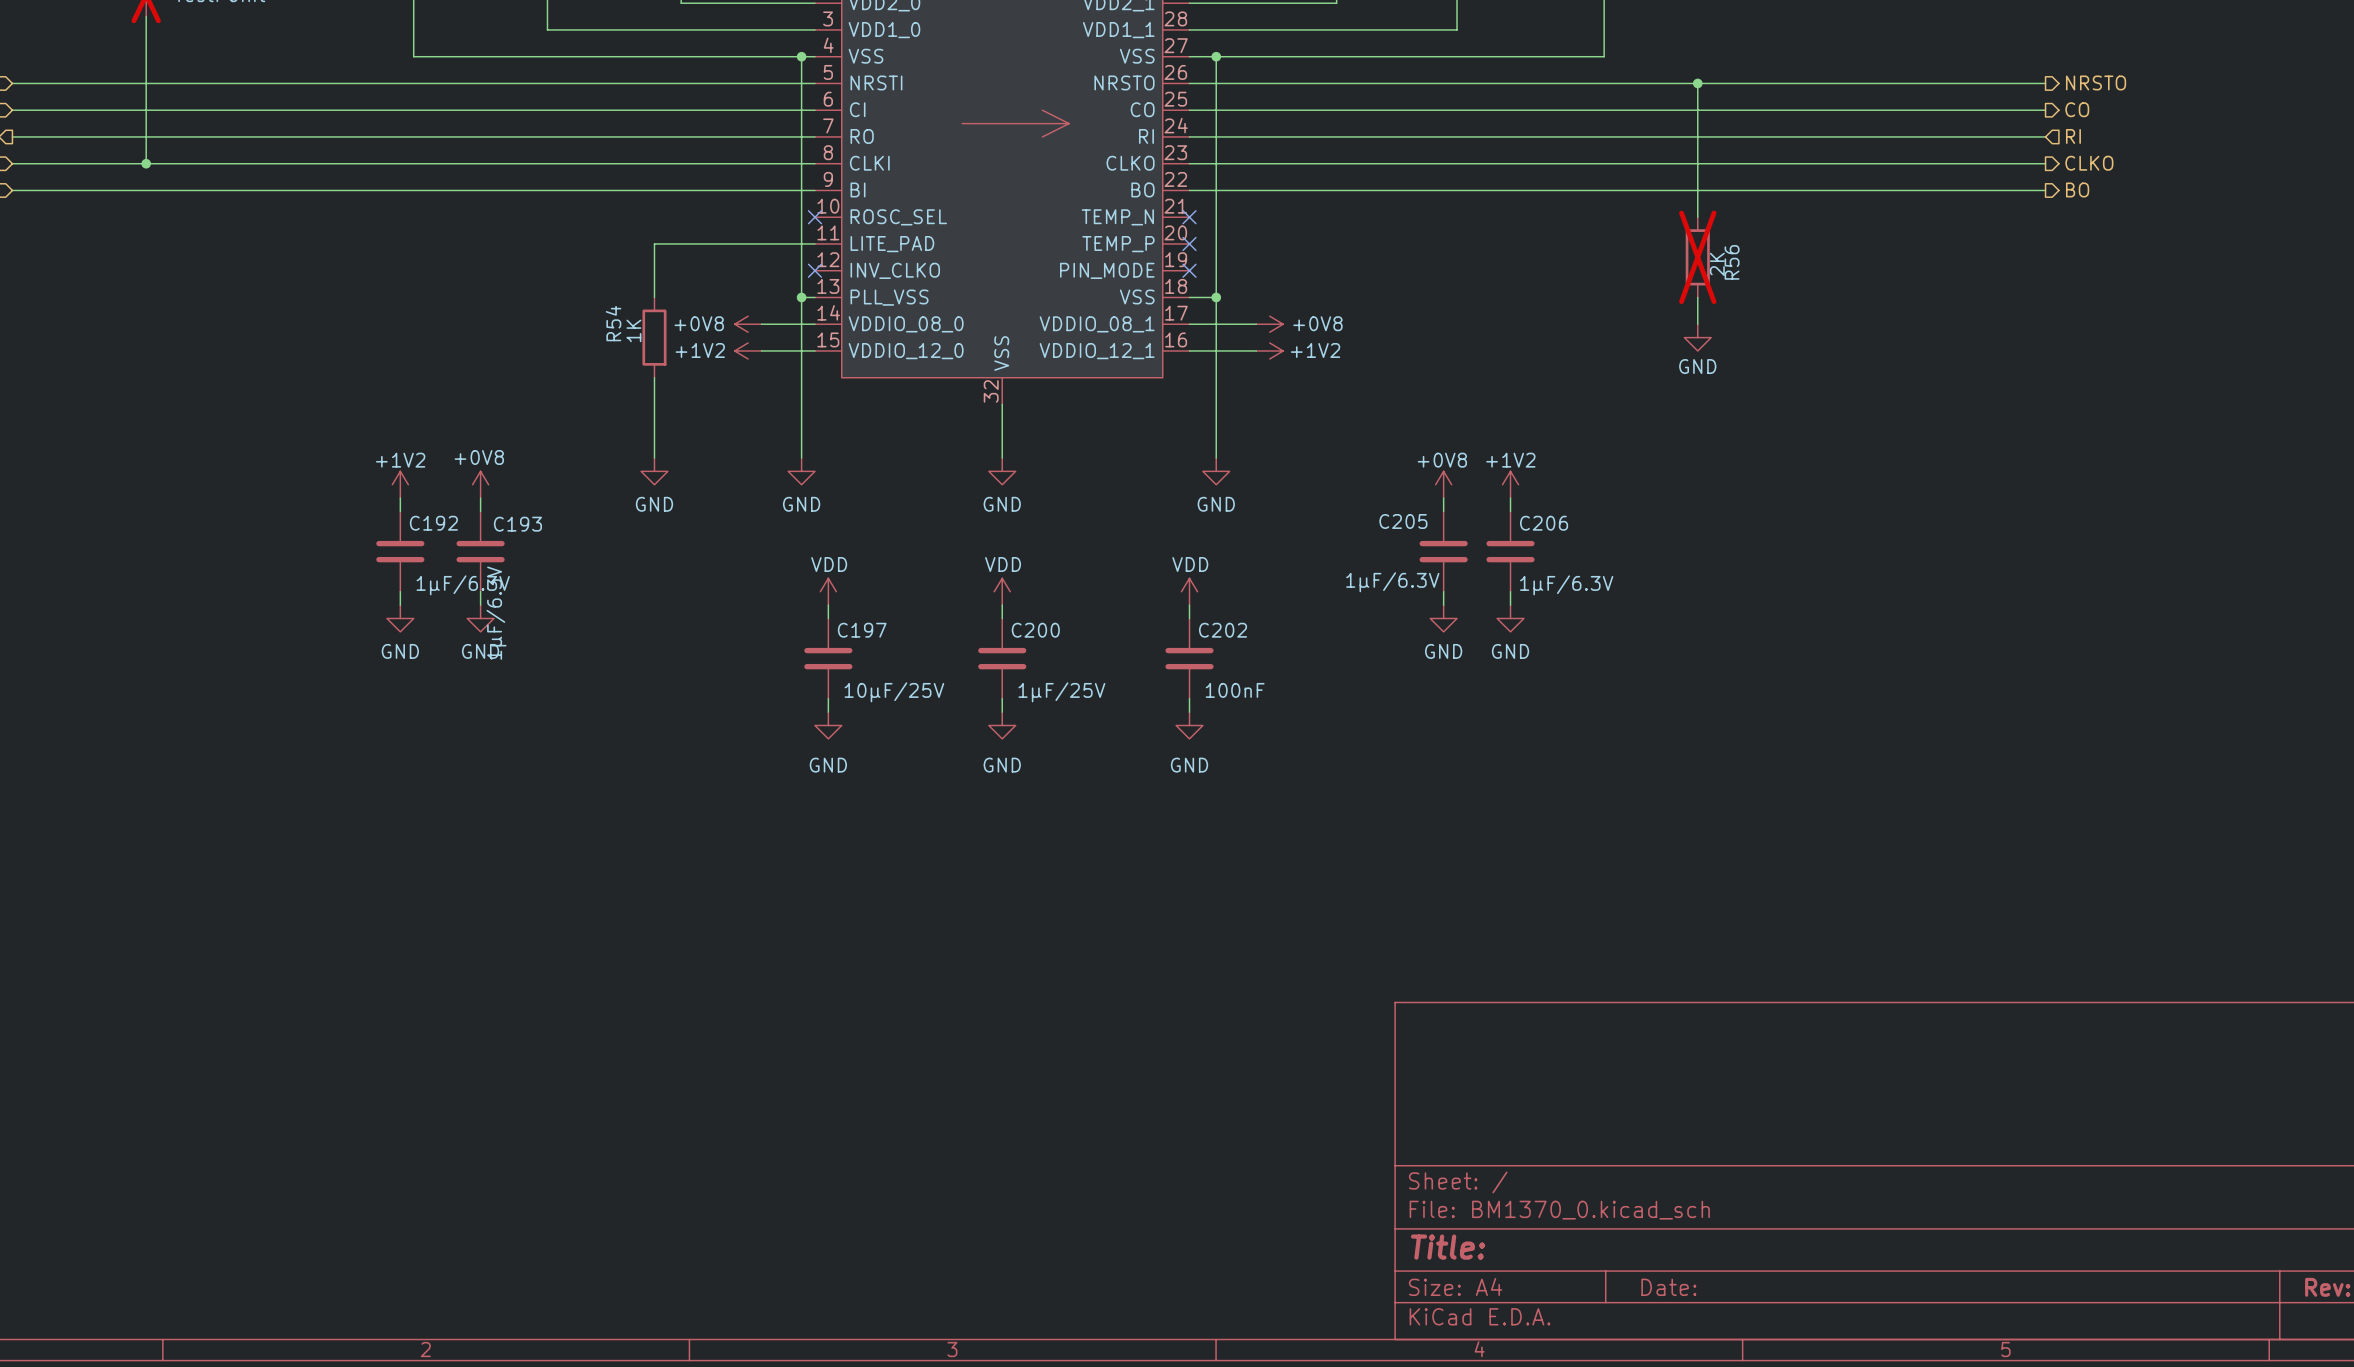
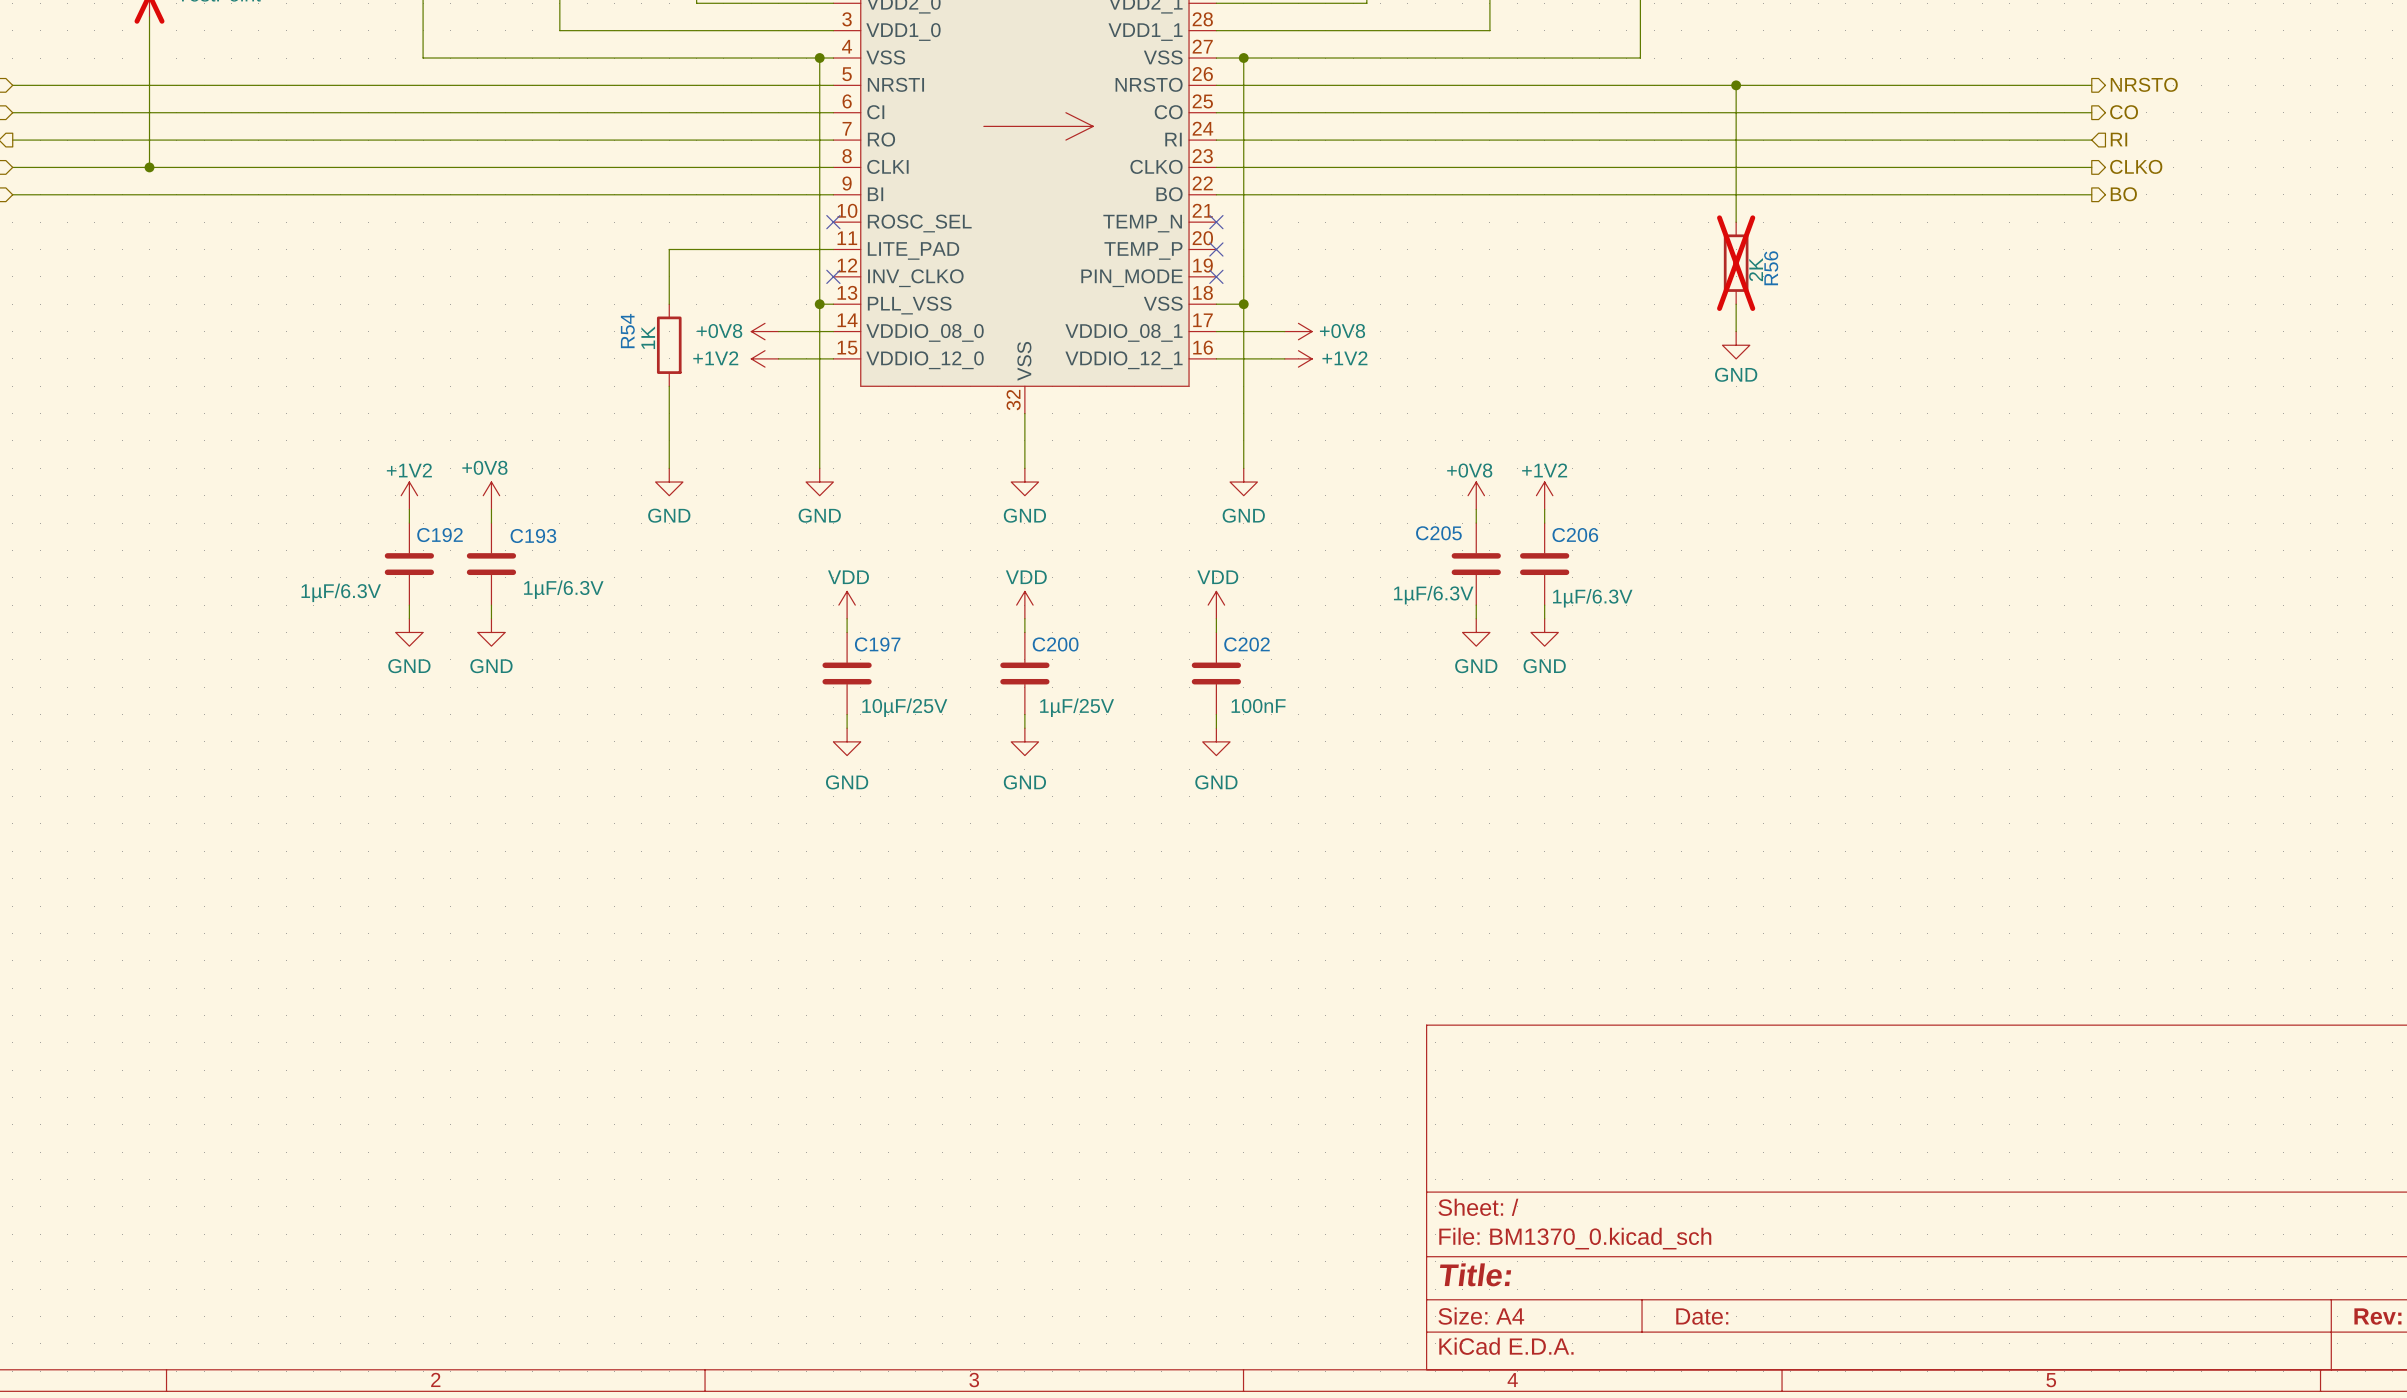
C192 value position: 1µF/6.3V (463, 585) -> 1µF/6.3V (341, 592)
C193 value rotation: 0° (496, 613) -> 90° clockwise (563, 589)

